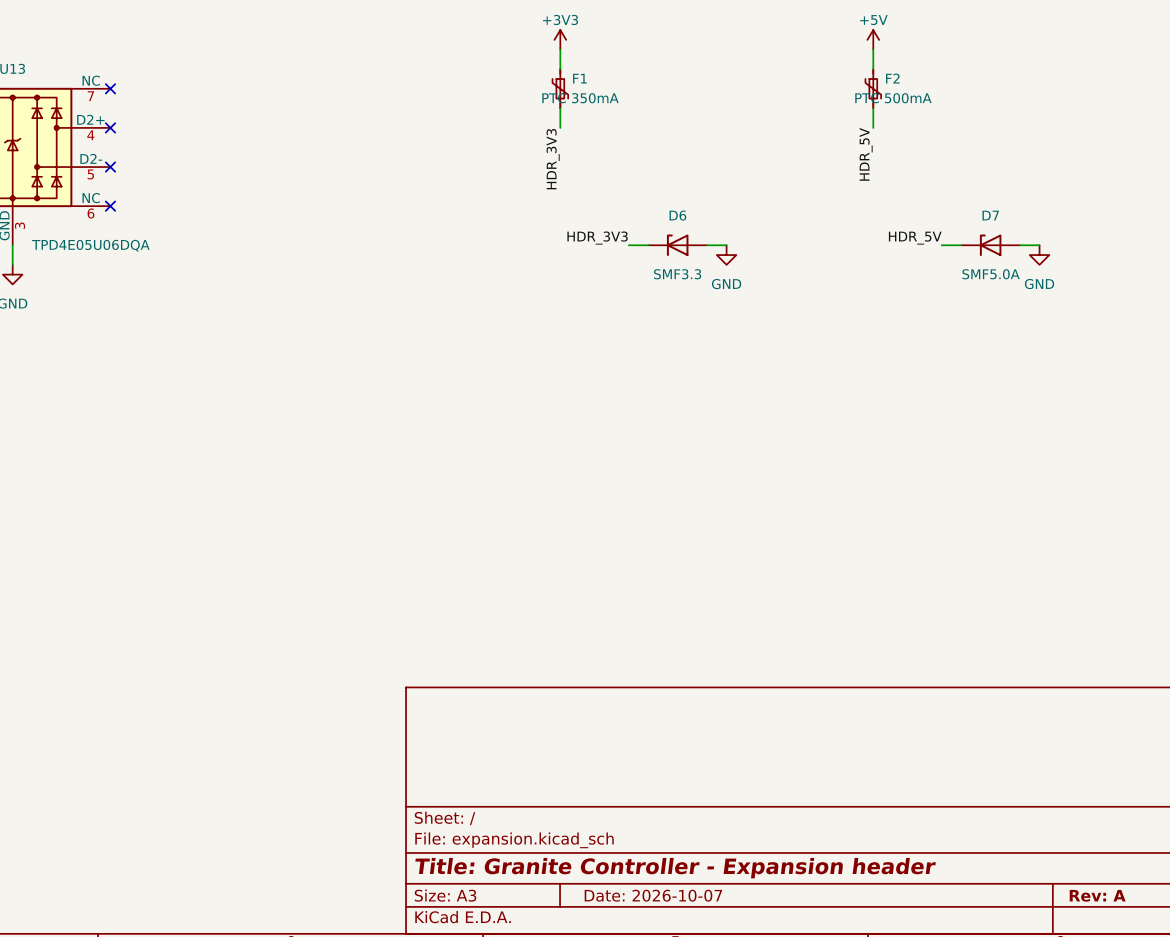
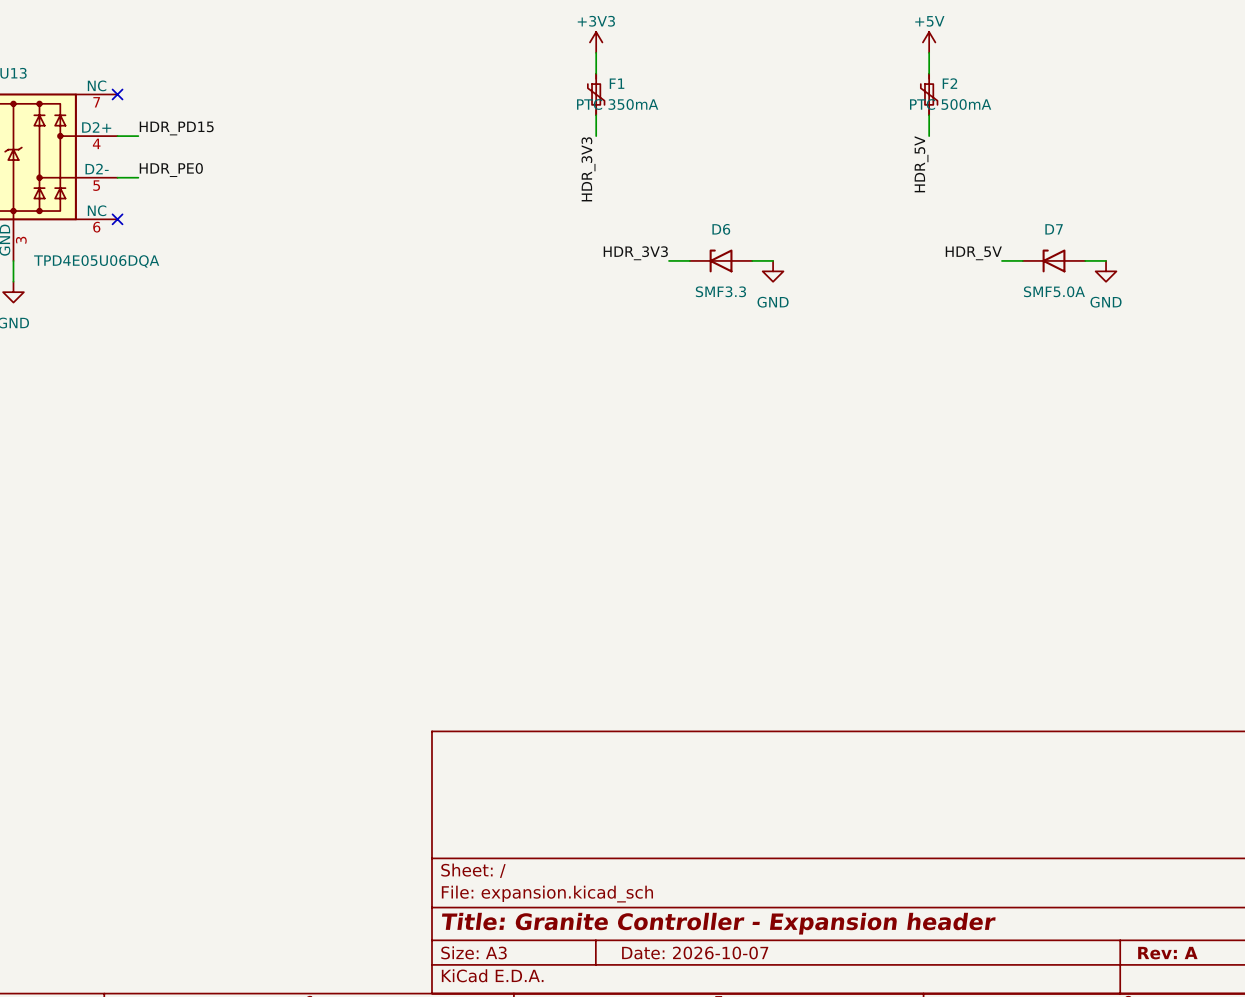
label: none -> HDR_PD15 (176, 128)
wire: none -> (117, 136) (138, 136)
no-connect mark: (110, 127) -> none
label: none -> HDR_PE0 (171, 170)
wire: none -> (117, 177) (138, 177)
no-connect mark: (110, 167) -> none

